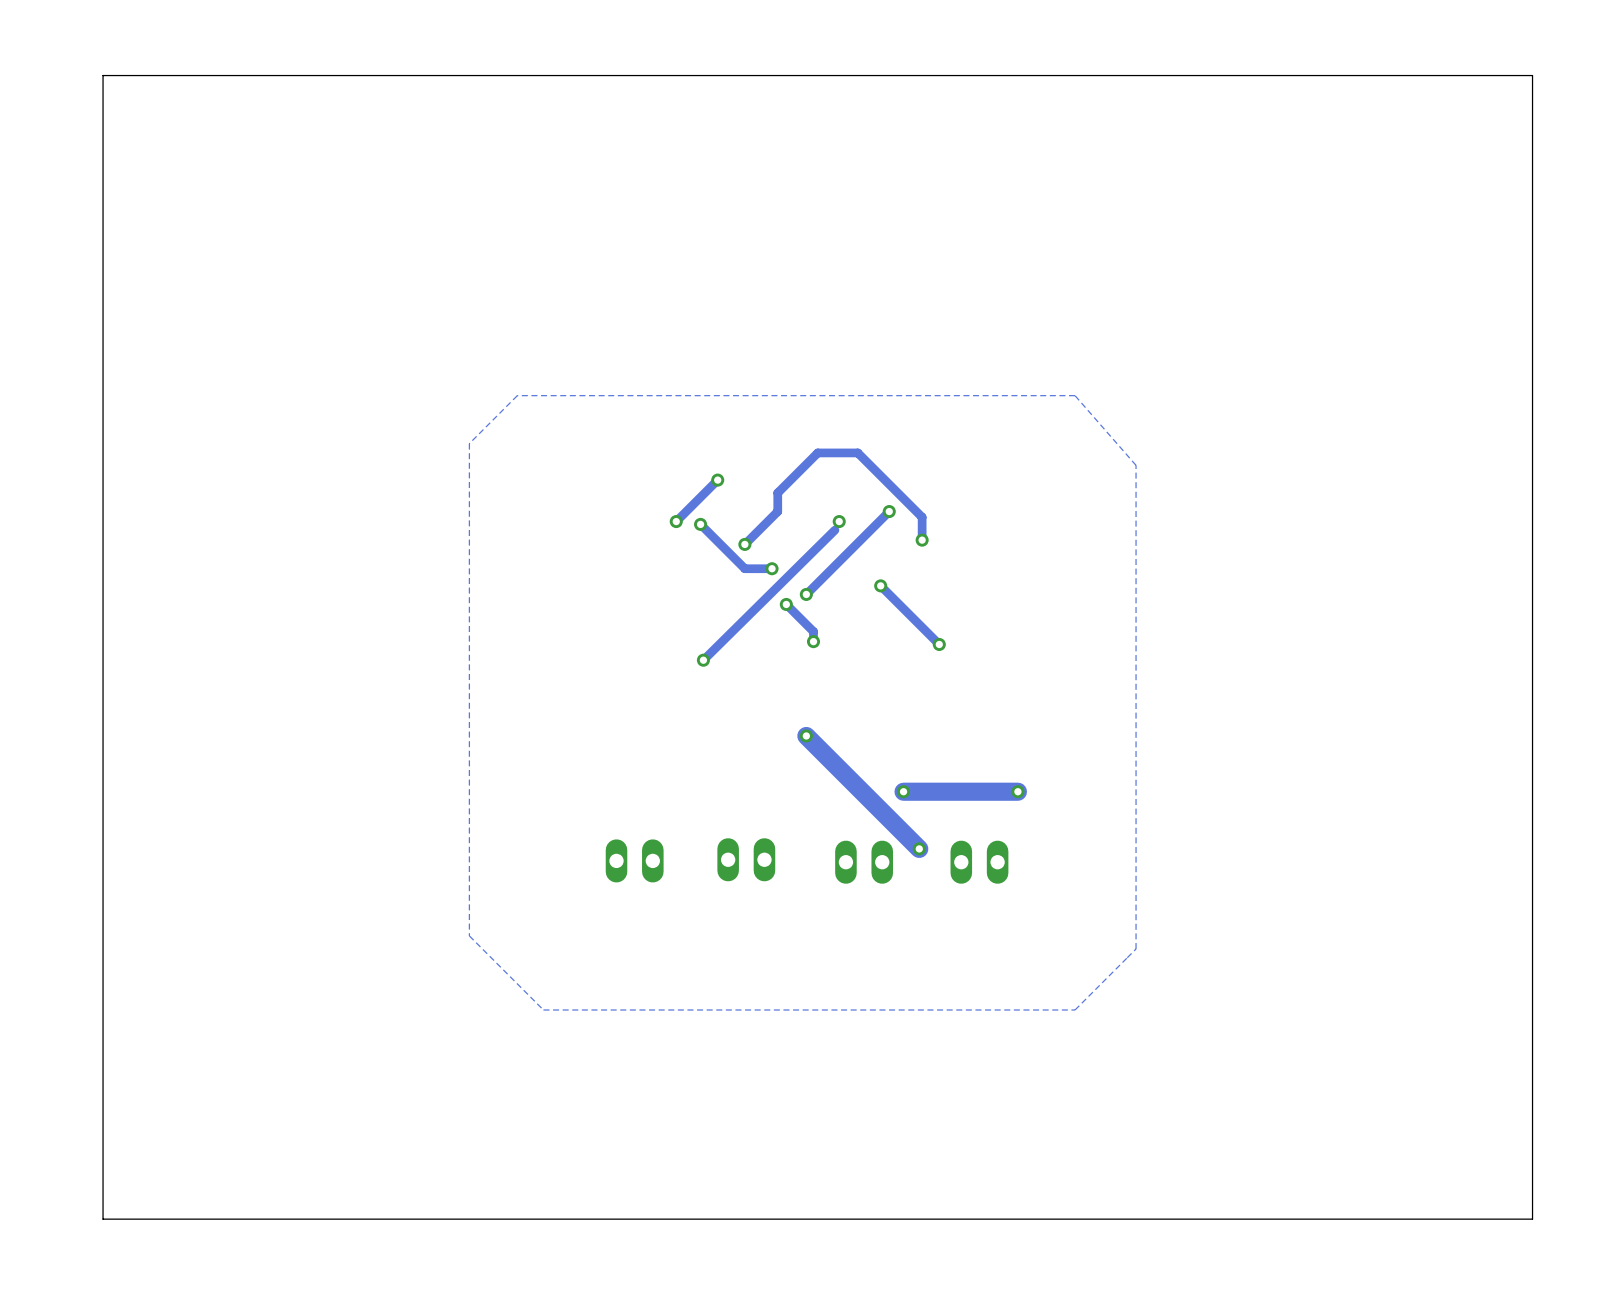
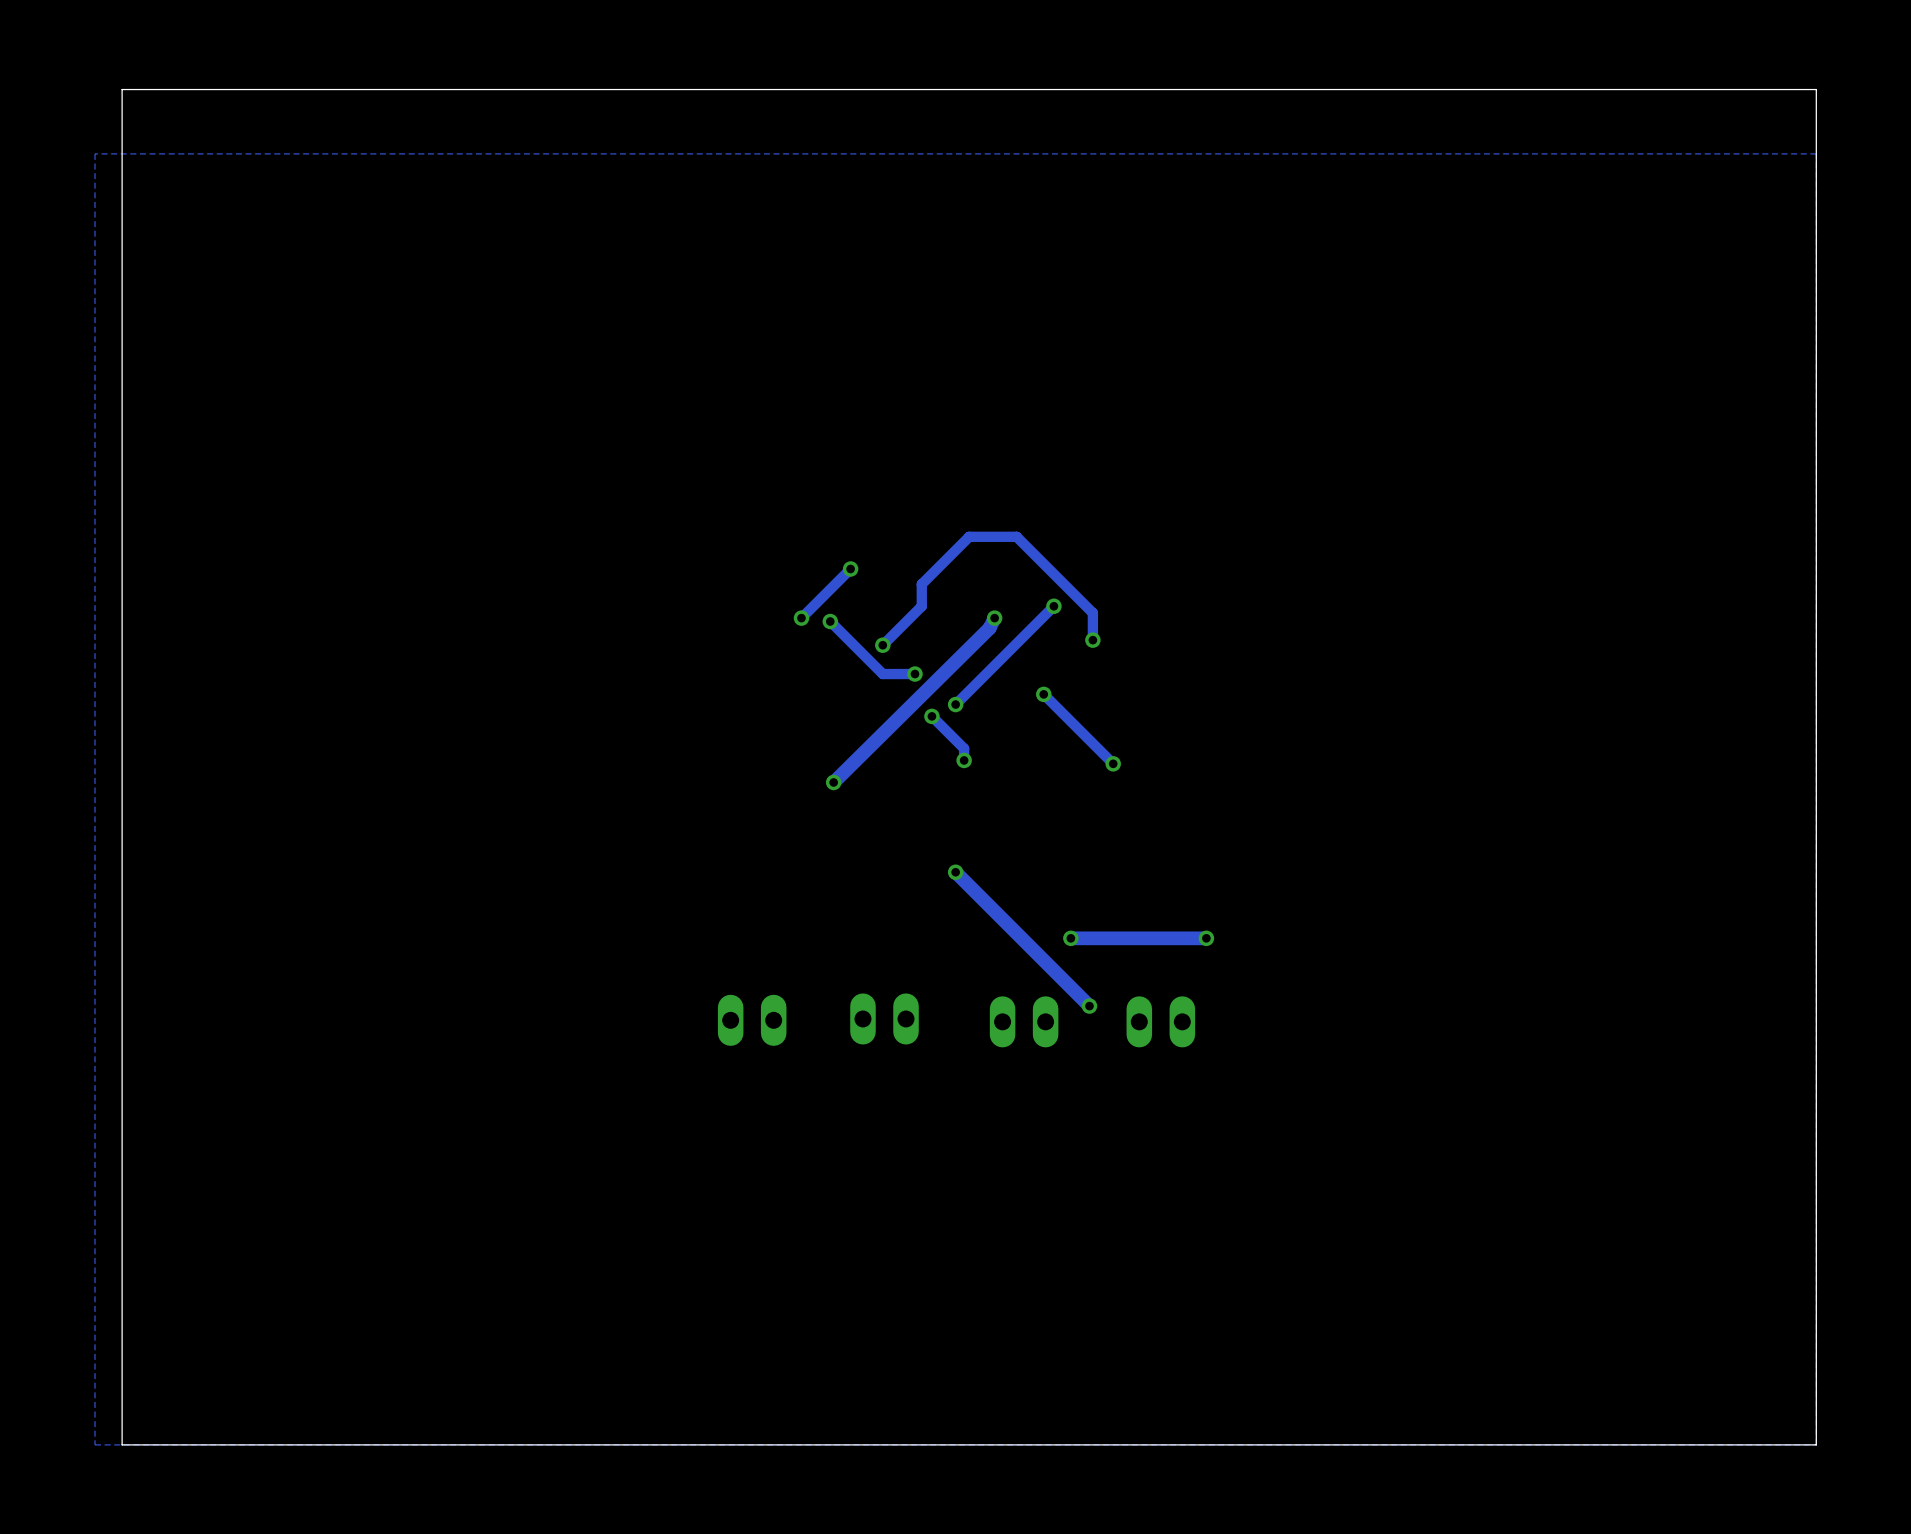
zone outline: none -> (1816, 153) (95, 153) (95, 1444) (1816, 1444) (1816, 153)
zone outline: (1075, 395) (517, 395) (469, 443) (469, 935) (543, 1010) (1075, 1010) (1136, 949) (1136, 465) (1075, 395) -> none
track width: thin (839, 521) (834, 530) (703, 660) -> thick (994, 618) (989, 628) (833, 782)
track width: thick (806, 735) (919, 848) -> thin (955, 872) (1089, 1006)
track width: thick (1017, 791) (903, 791) -> thin (1206, 938) (1070, 938)

